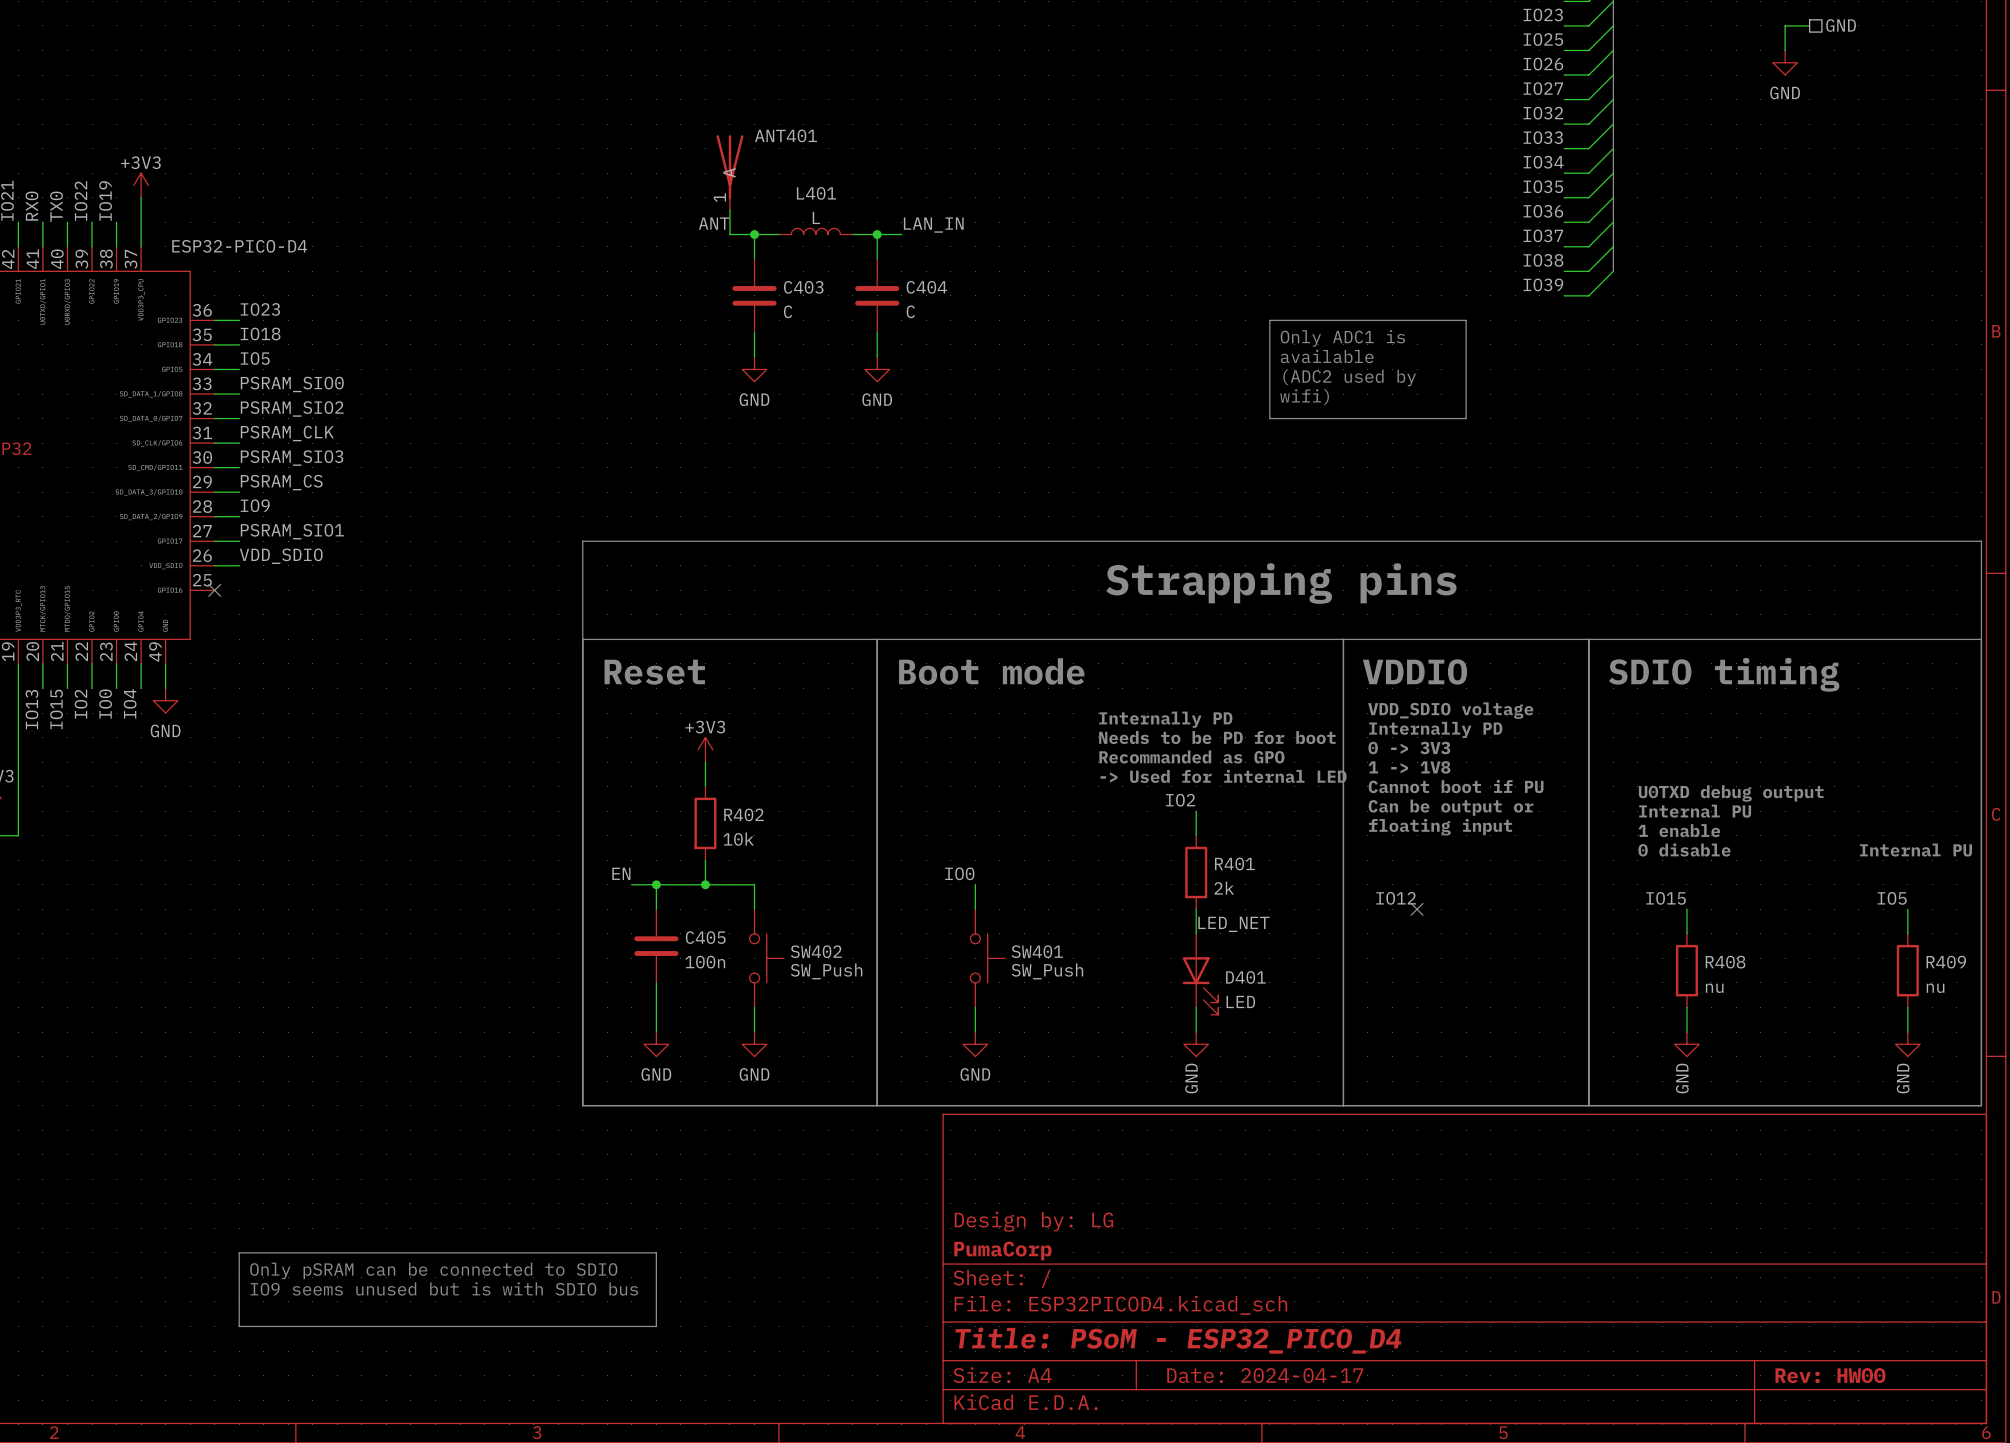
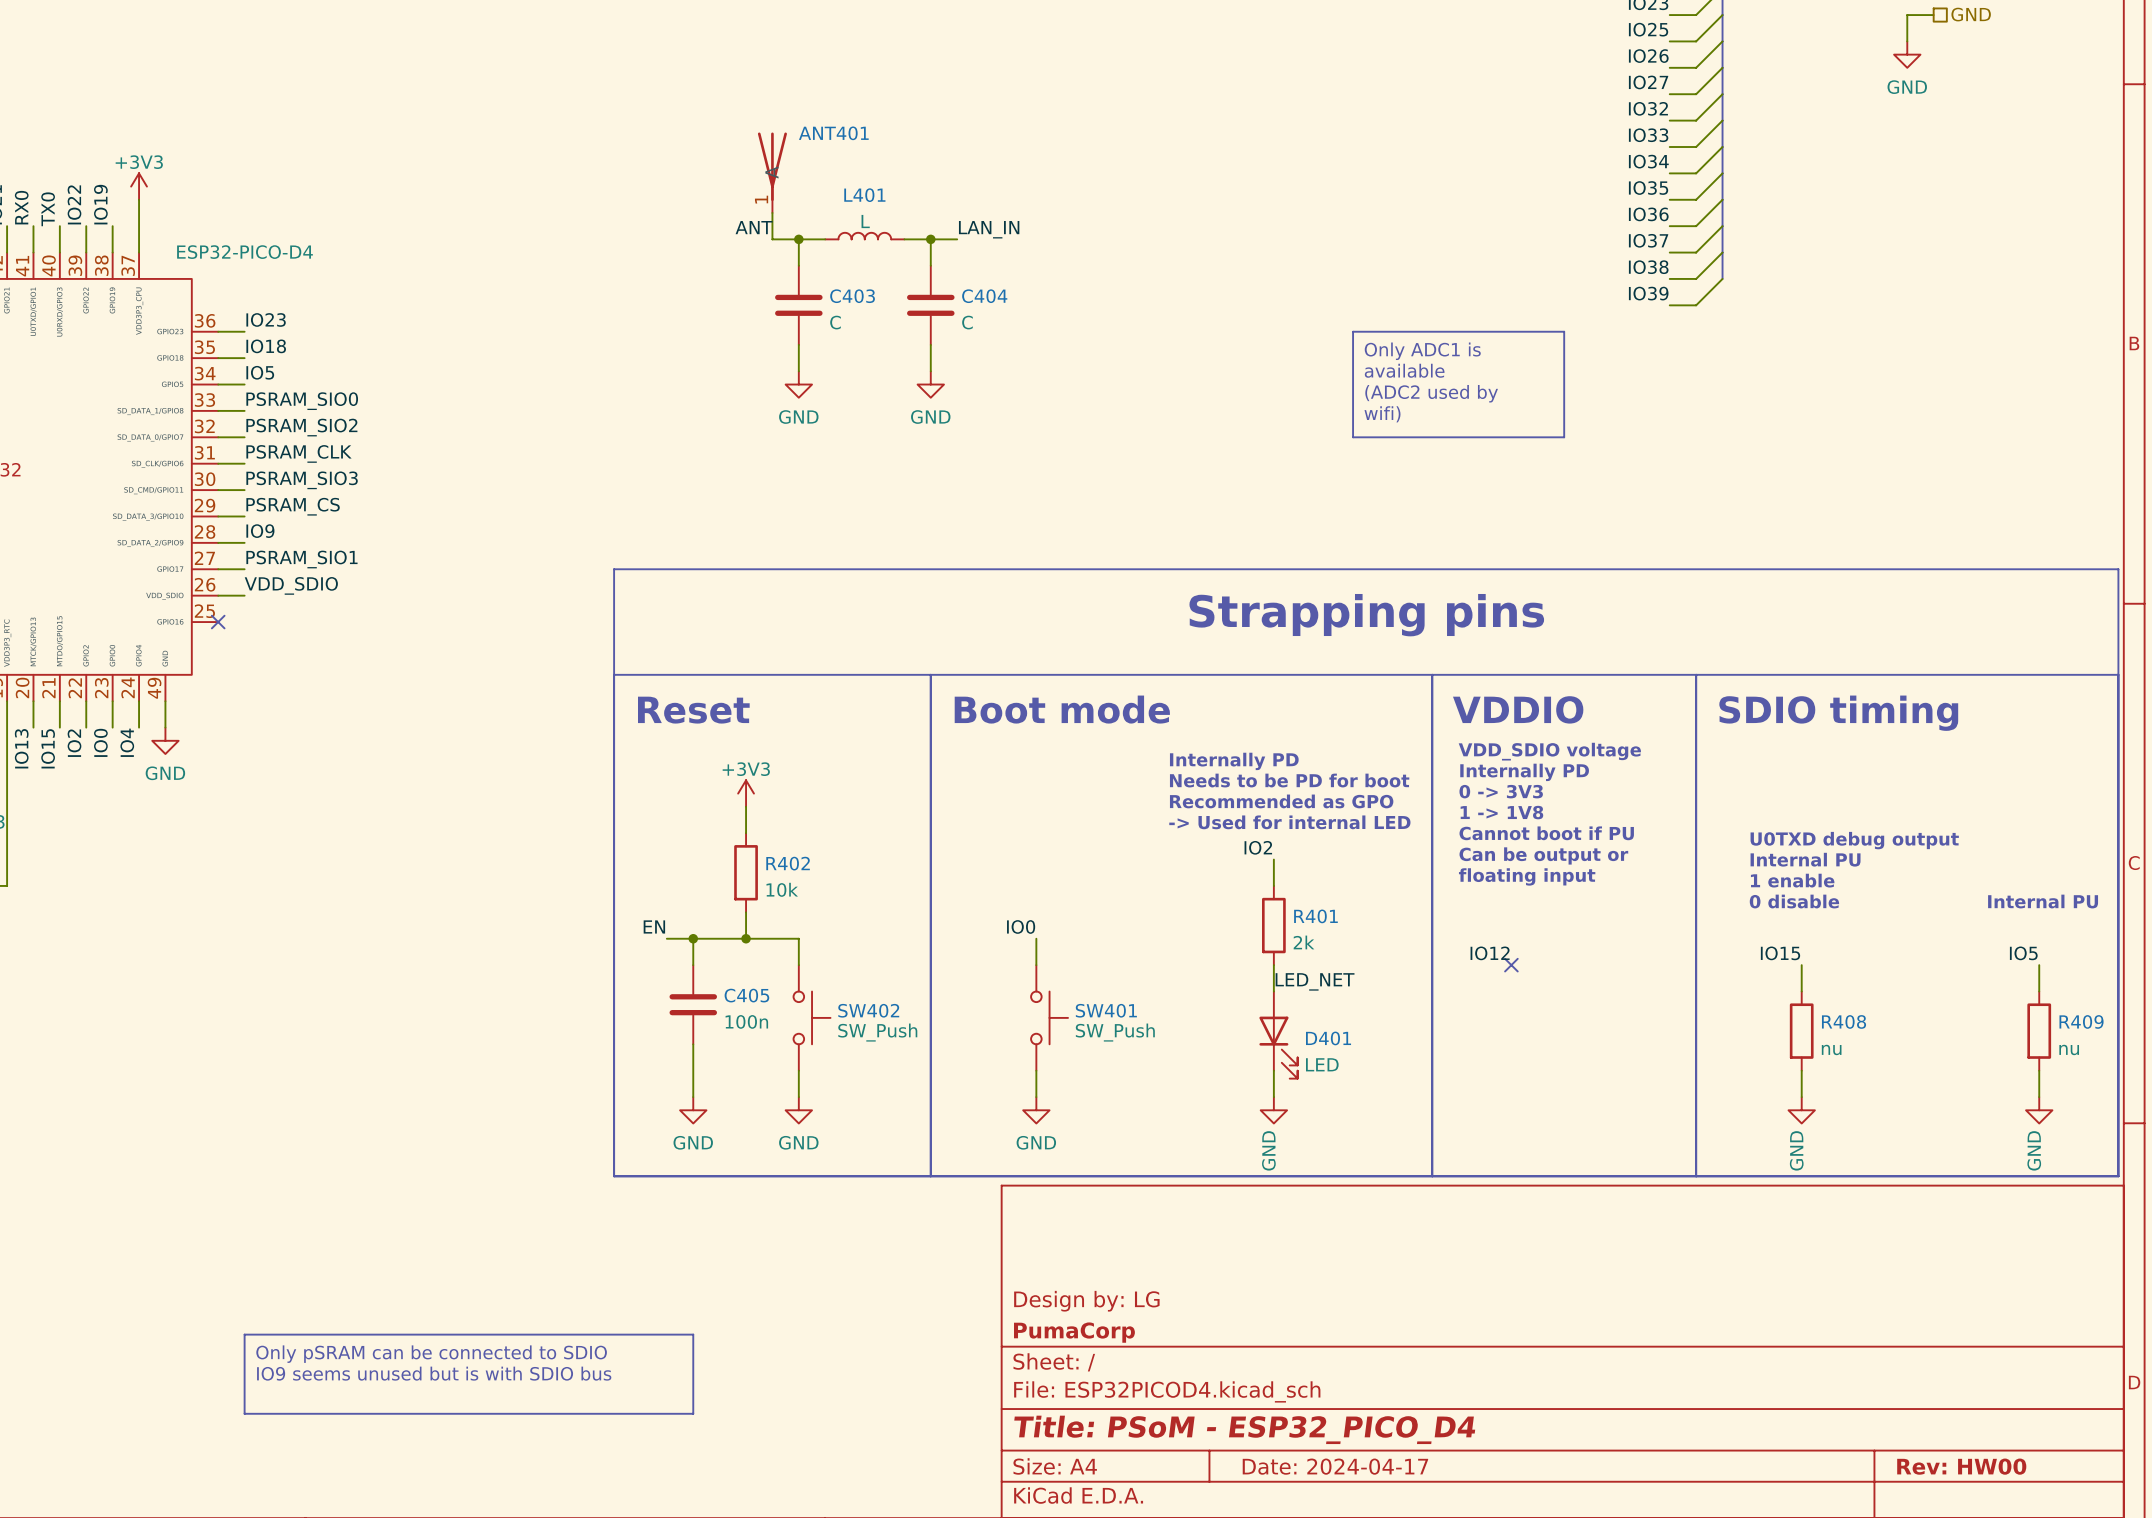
text: Recommanded as GPO (1191, 756) -> Recommended as GPO (1281, 801)

